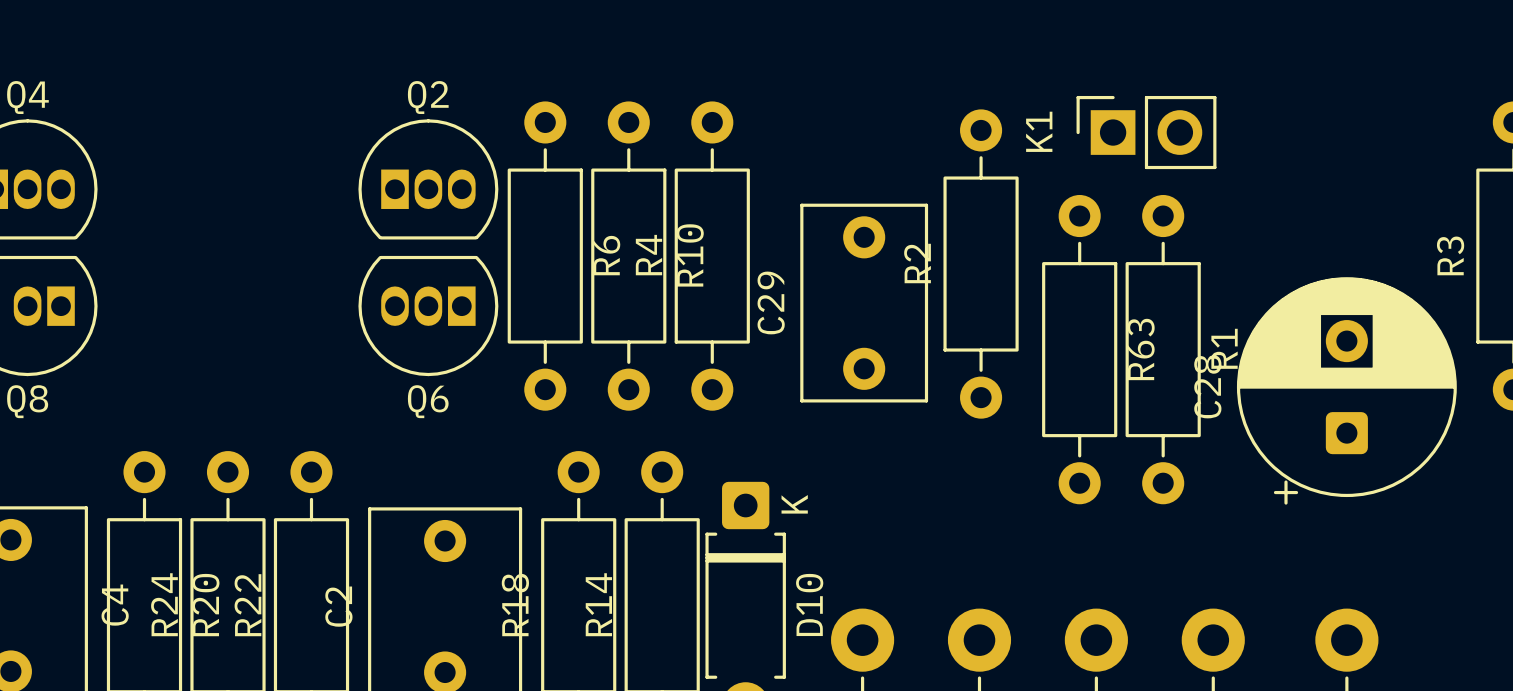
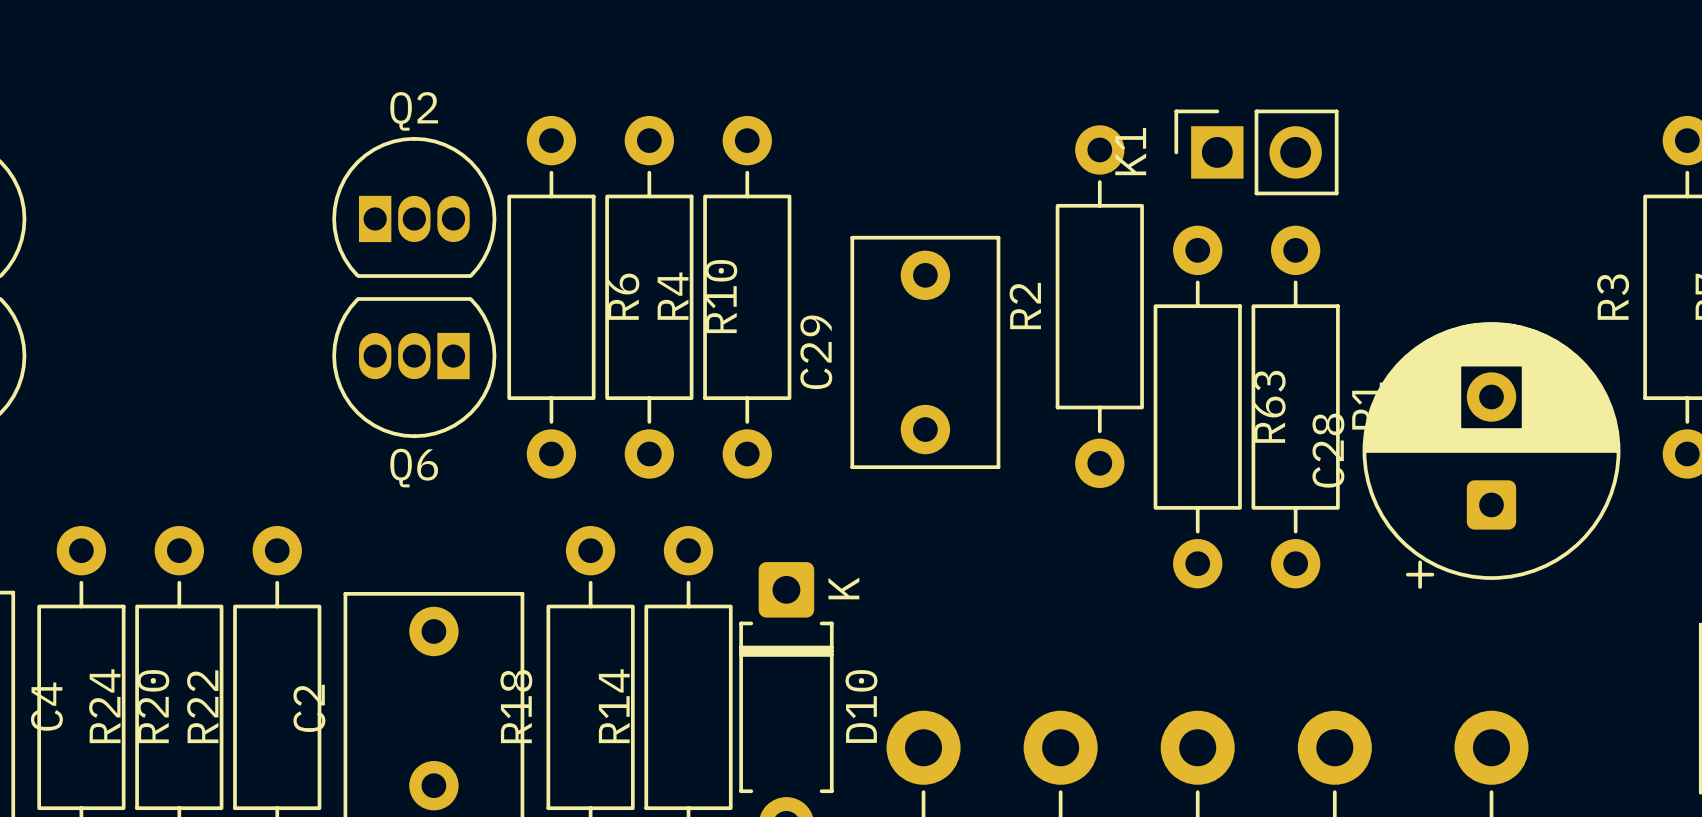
R2 position: (981, 264) -> (1099, 306)
R63 position: (1079, 349) -> (1197, 407)
R1 position: (1163, 349) -> (1295, 407)

